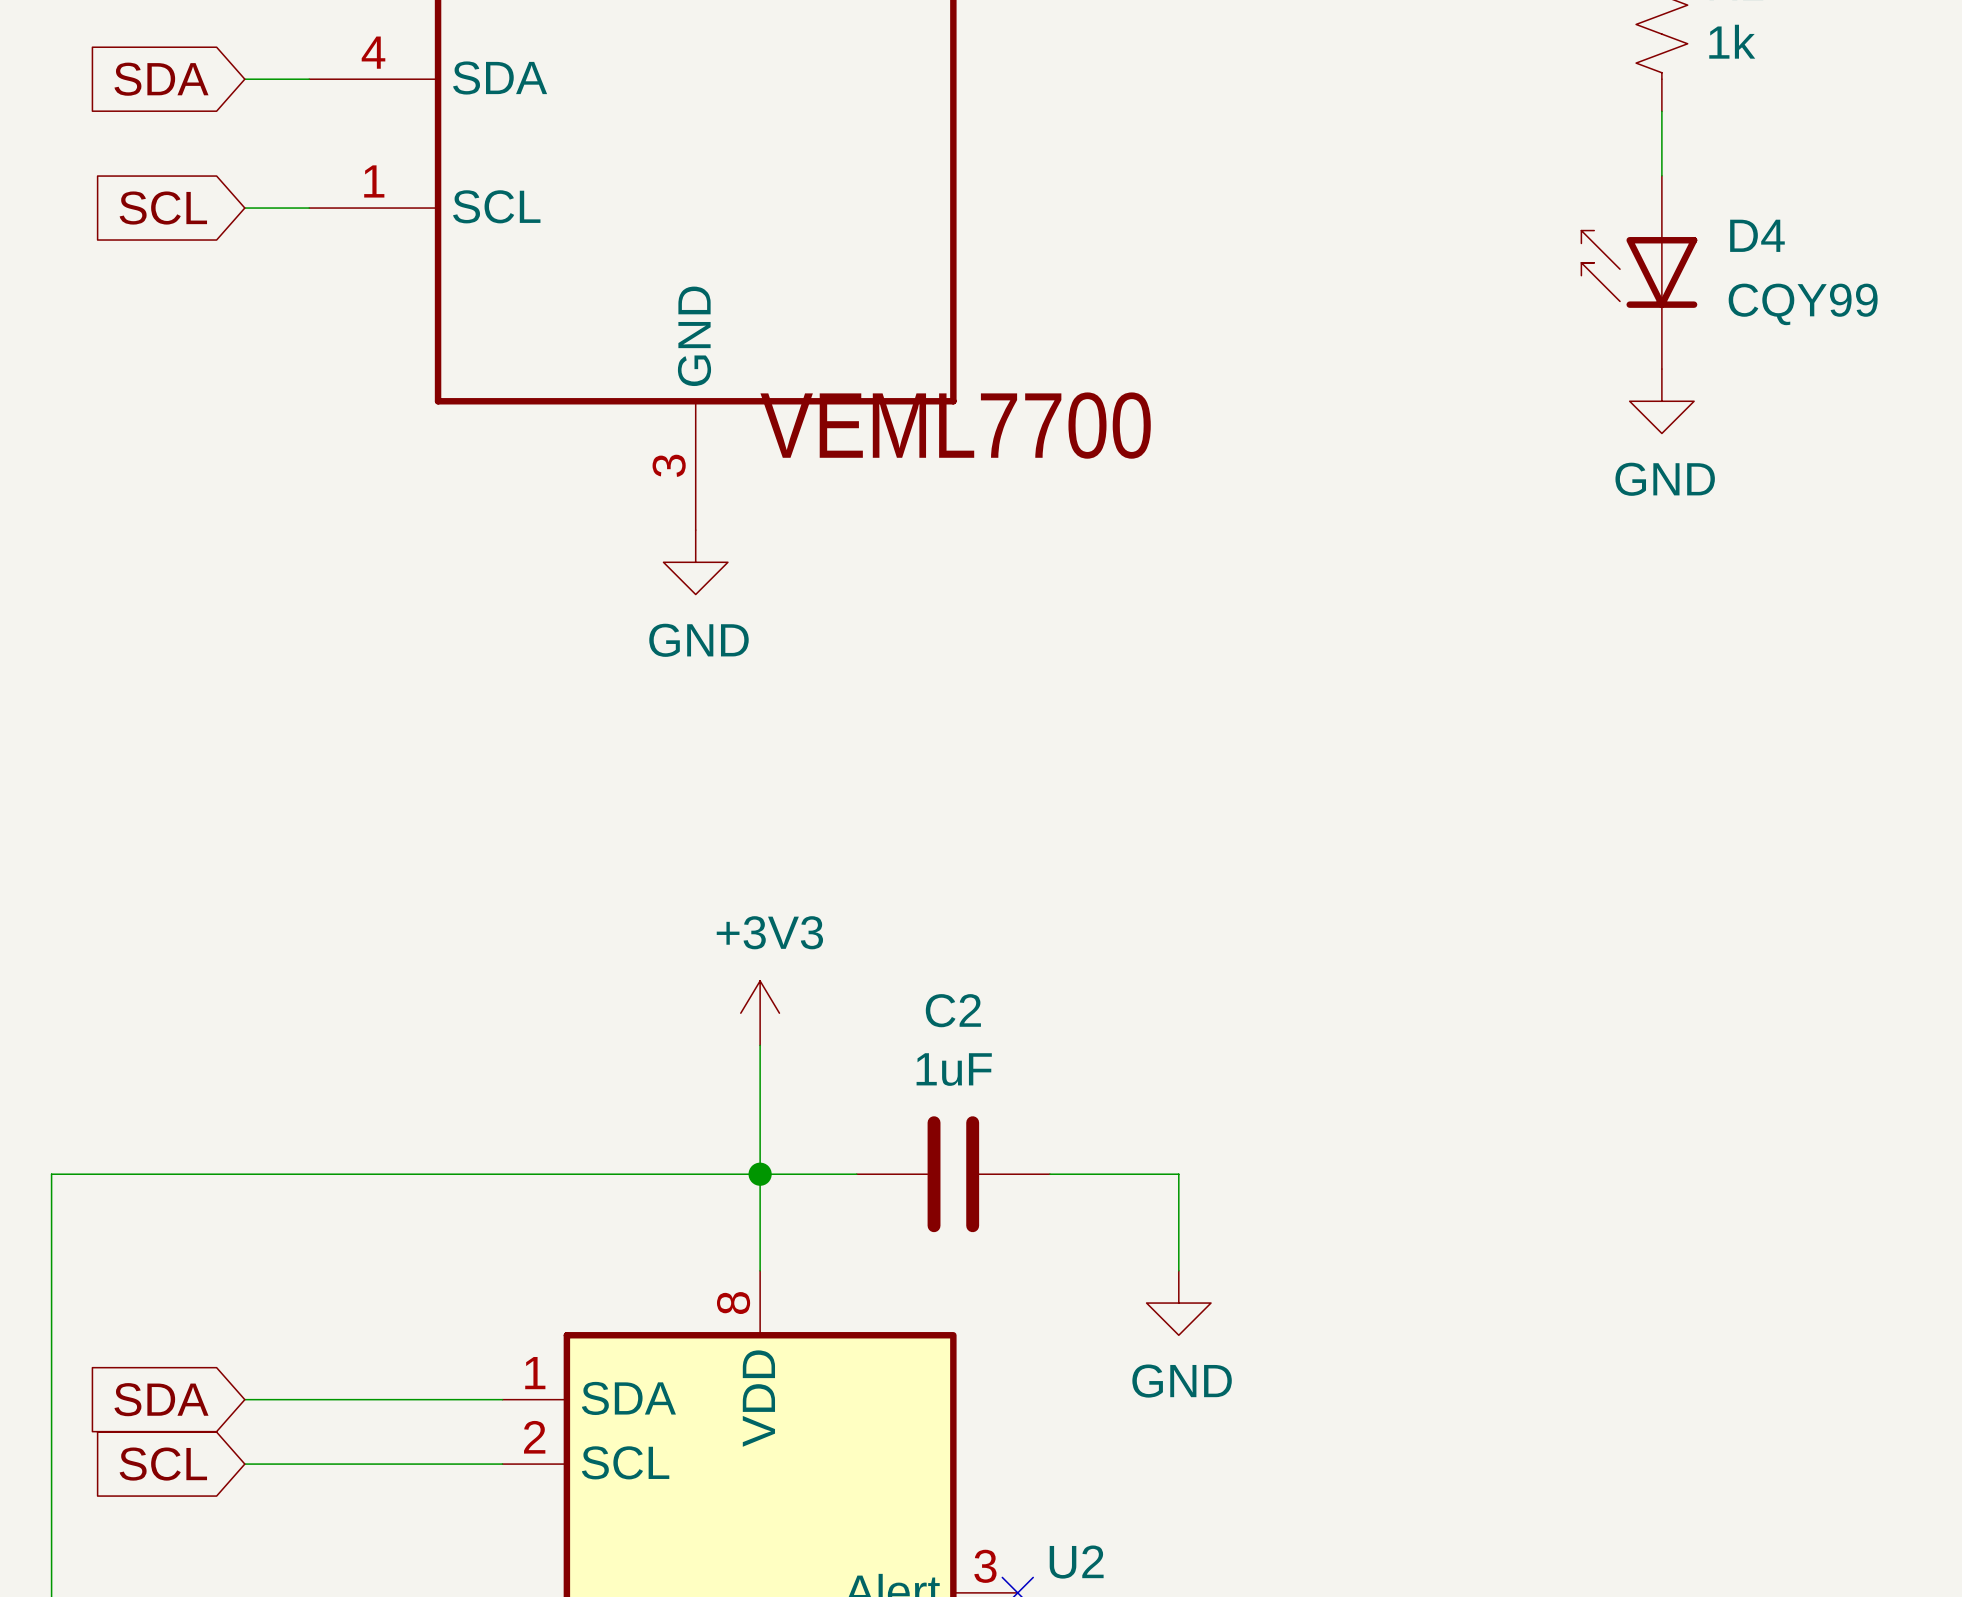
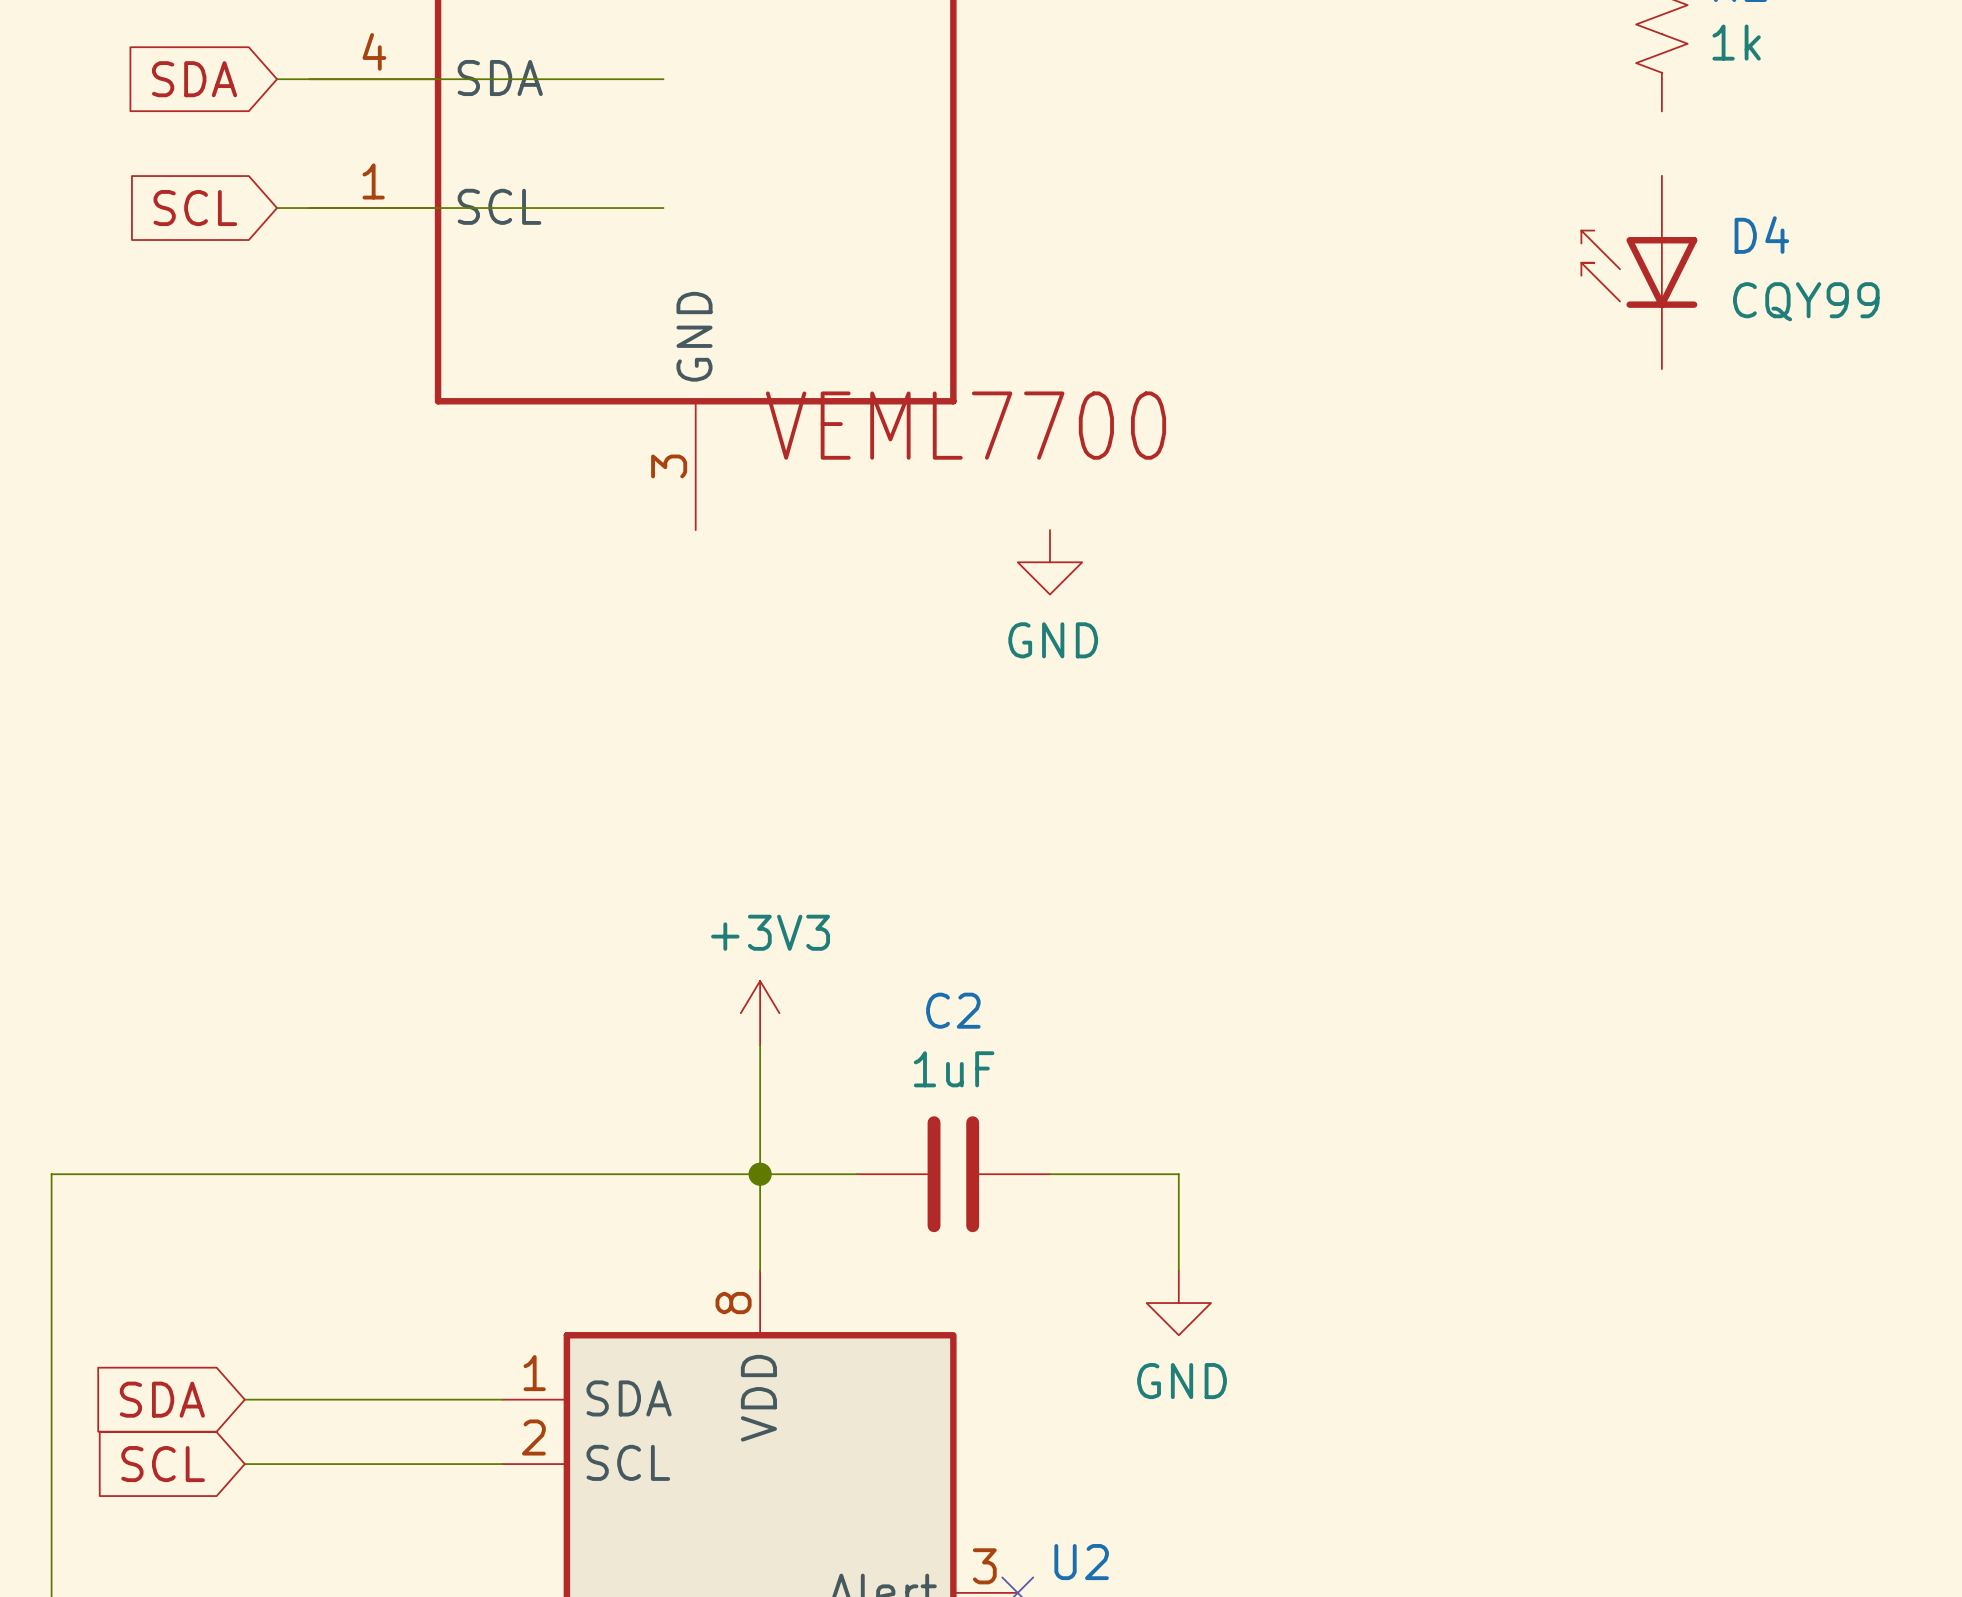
global label position: SDA (161, 79) -> SDA (194, 79)
wire: (244, 79) (277, 79) -> none
wire: none -> (309, 79) (663, 79)
wire: (1661, 111) (1661, 175) -> none
global label position: SCL (163, 208) -> SCL (195, 208)
wire: (244, 208) (277, 208) -> none
wire: none -> (309, 208) (663, 208)
power symbol: GND (1661, 401) -> none
power symbol: GND (695, 562) -> none
power symbol: none -> GND (1049, 562)

